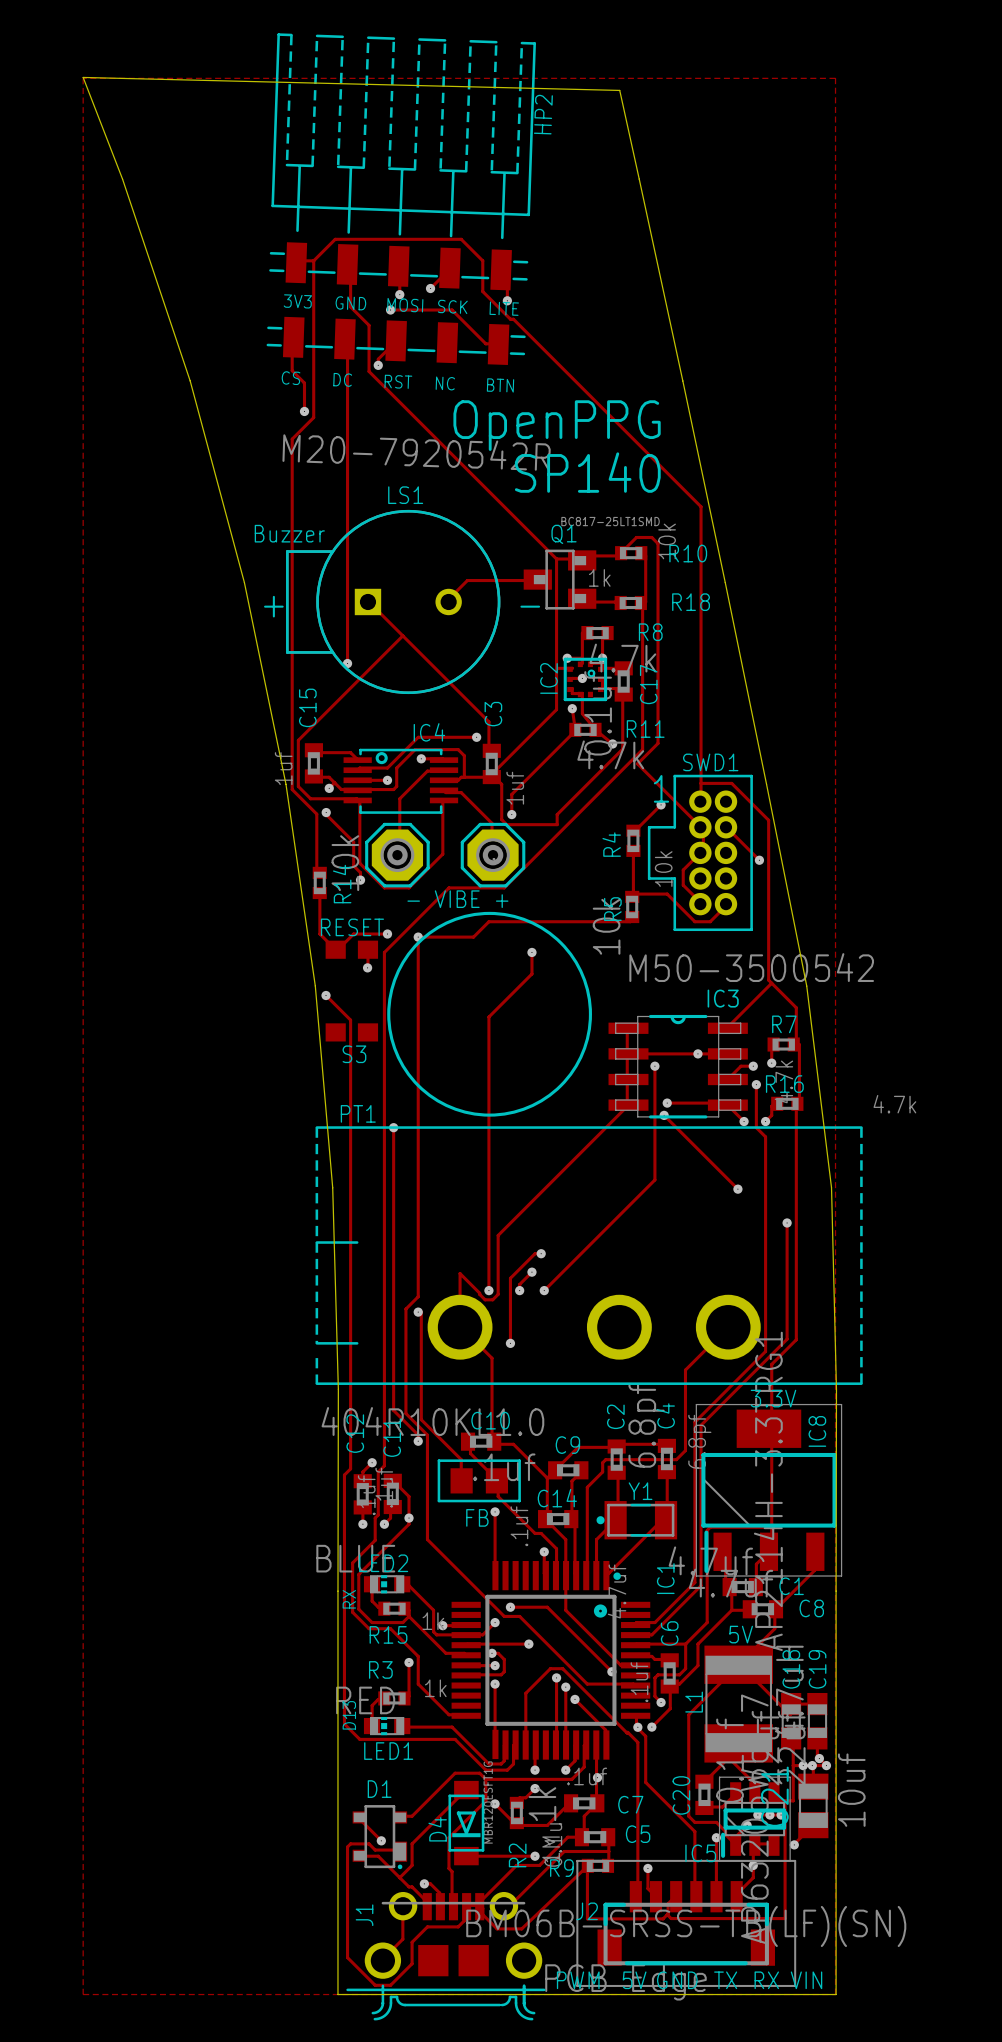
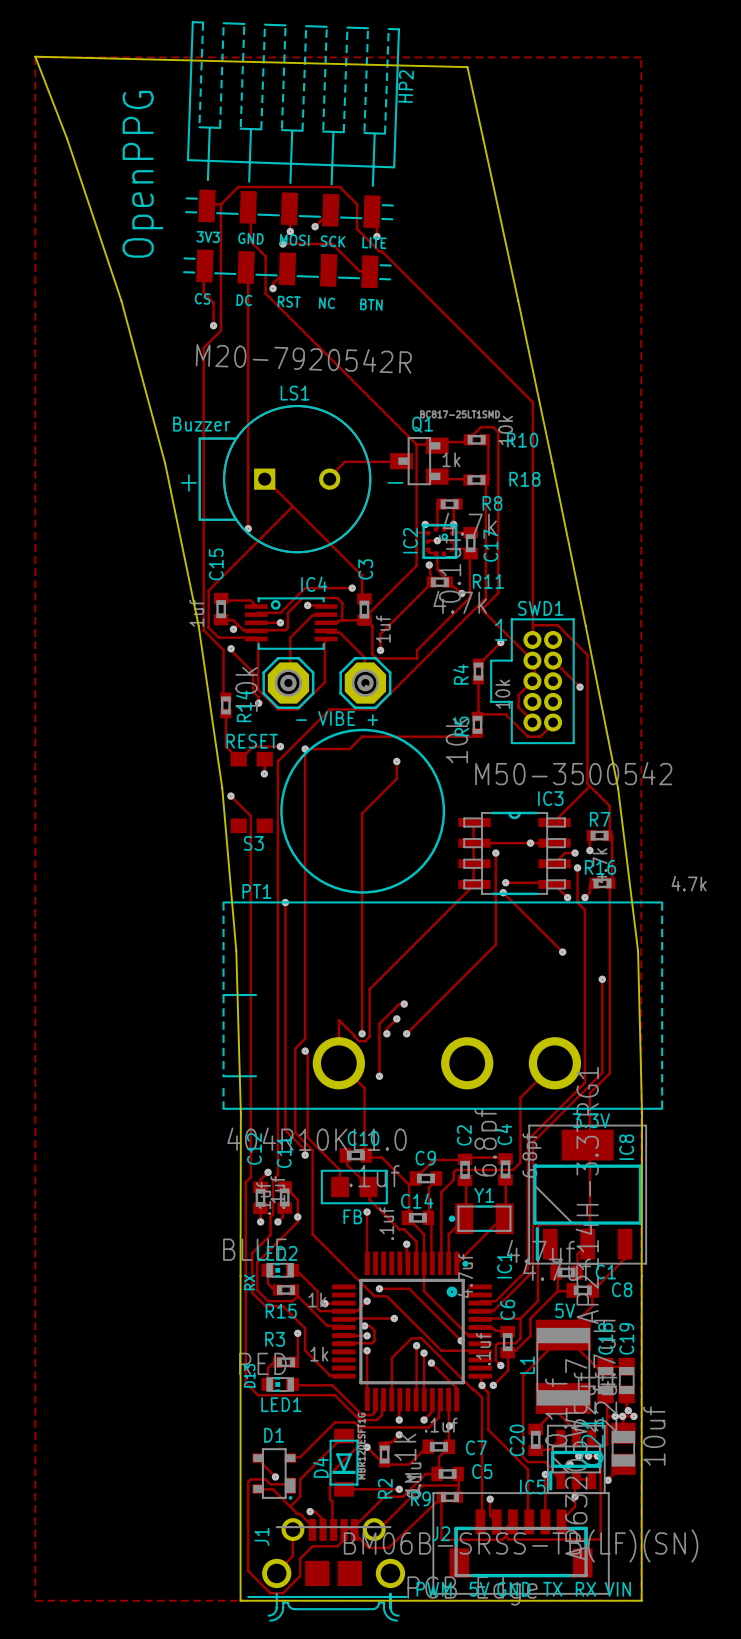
text rotation: 0° (557, 425) -> 90° counterclockwise (142, 174)
text position: OpenPPG (557, 425) -> OpenPPG (142, 174)
text: SP140 (587, 472) -> none

